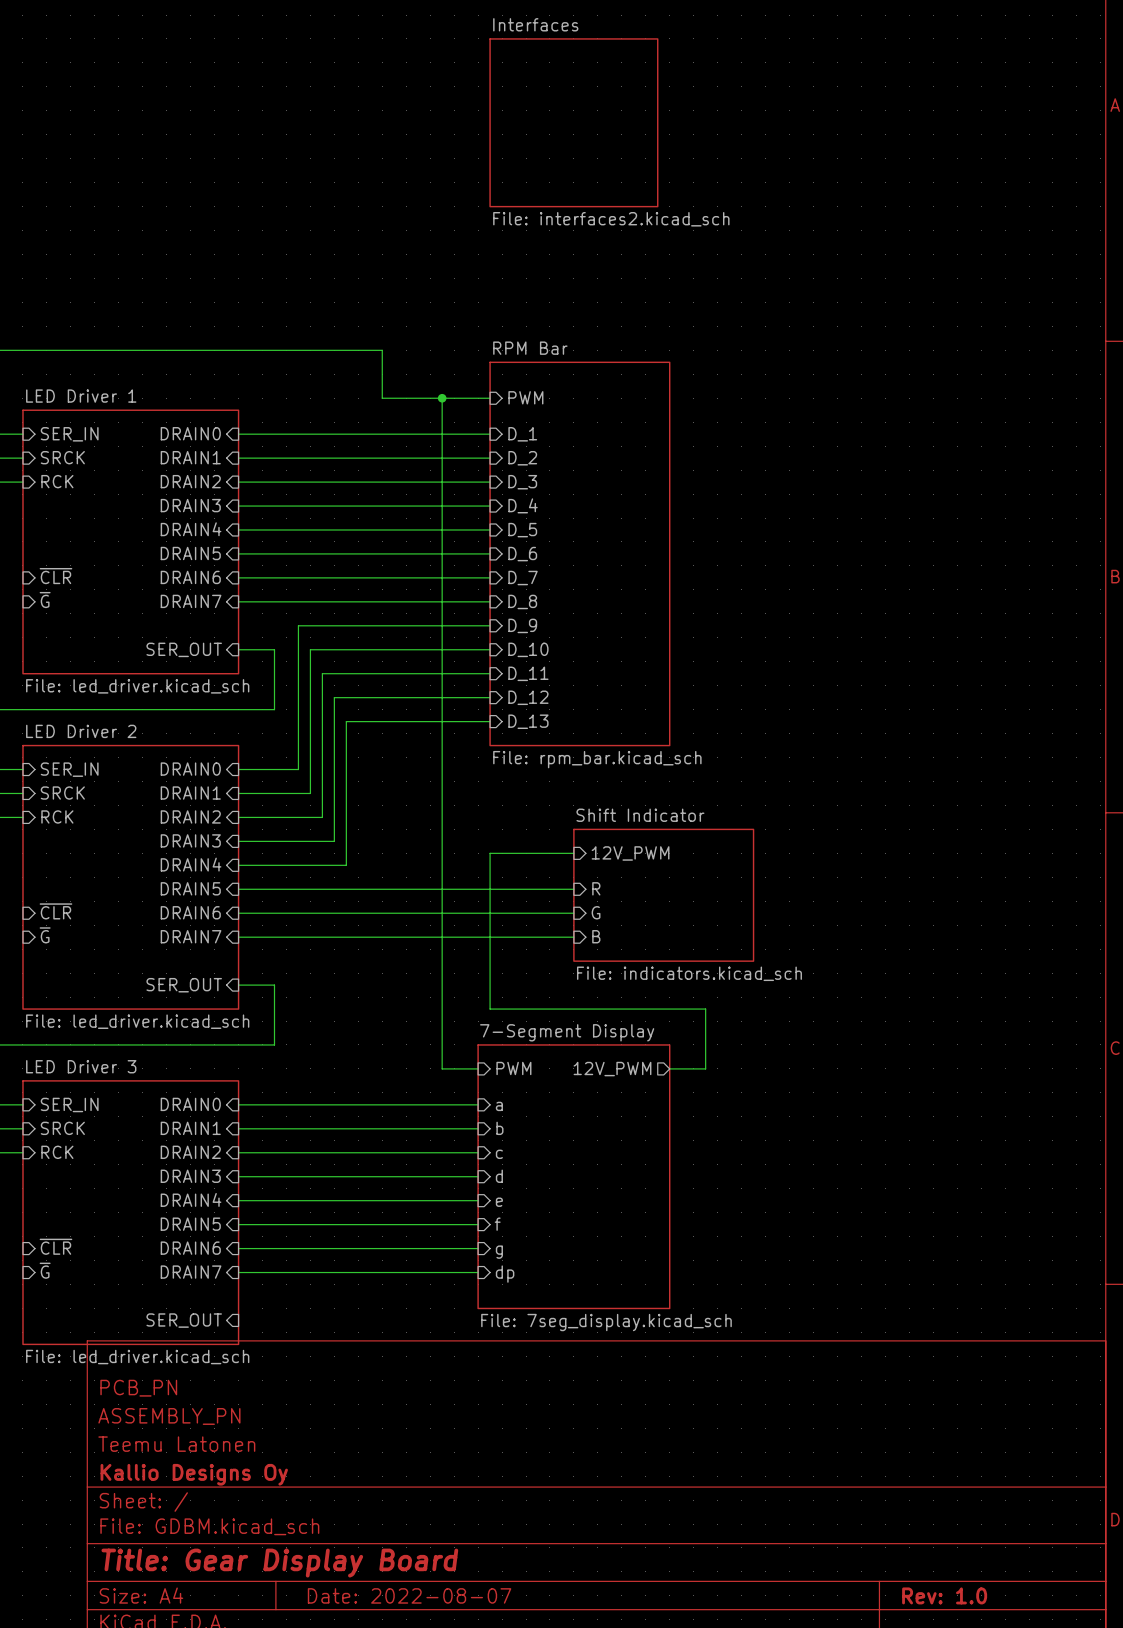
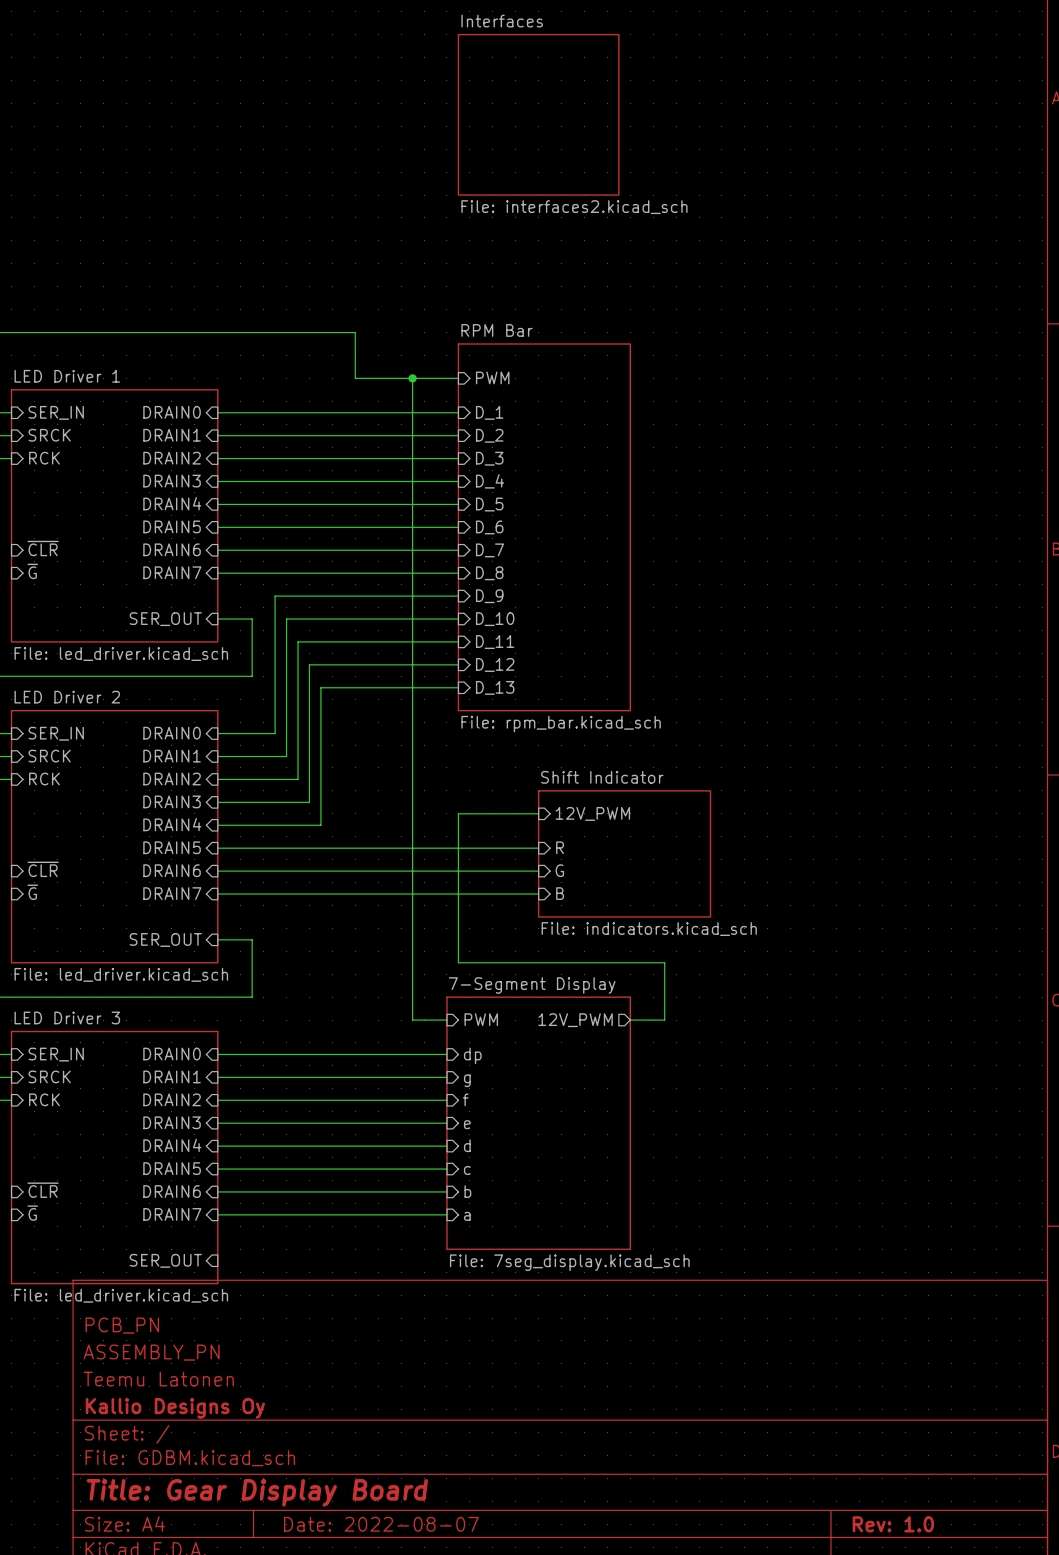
sheet pin: a (499, 1106) -> dp (472, 1055)
sheet pin: b (499, 1128) -> g (467, 1080)
sheet pin: c (499, 1154) -> f (465, 1099)
sheet pin: d (499, 1176) -> e (467, 1124)
sheet pin: e (499, 1202) -> d (467, 1145)
sheet pin: f (497, 1224) -> c (467, 1170)
sheet pin: g (499, 1252) -> b (467, 1191)
sheet pin: dp (505, 1274) -> a (467, 1216)

